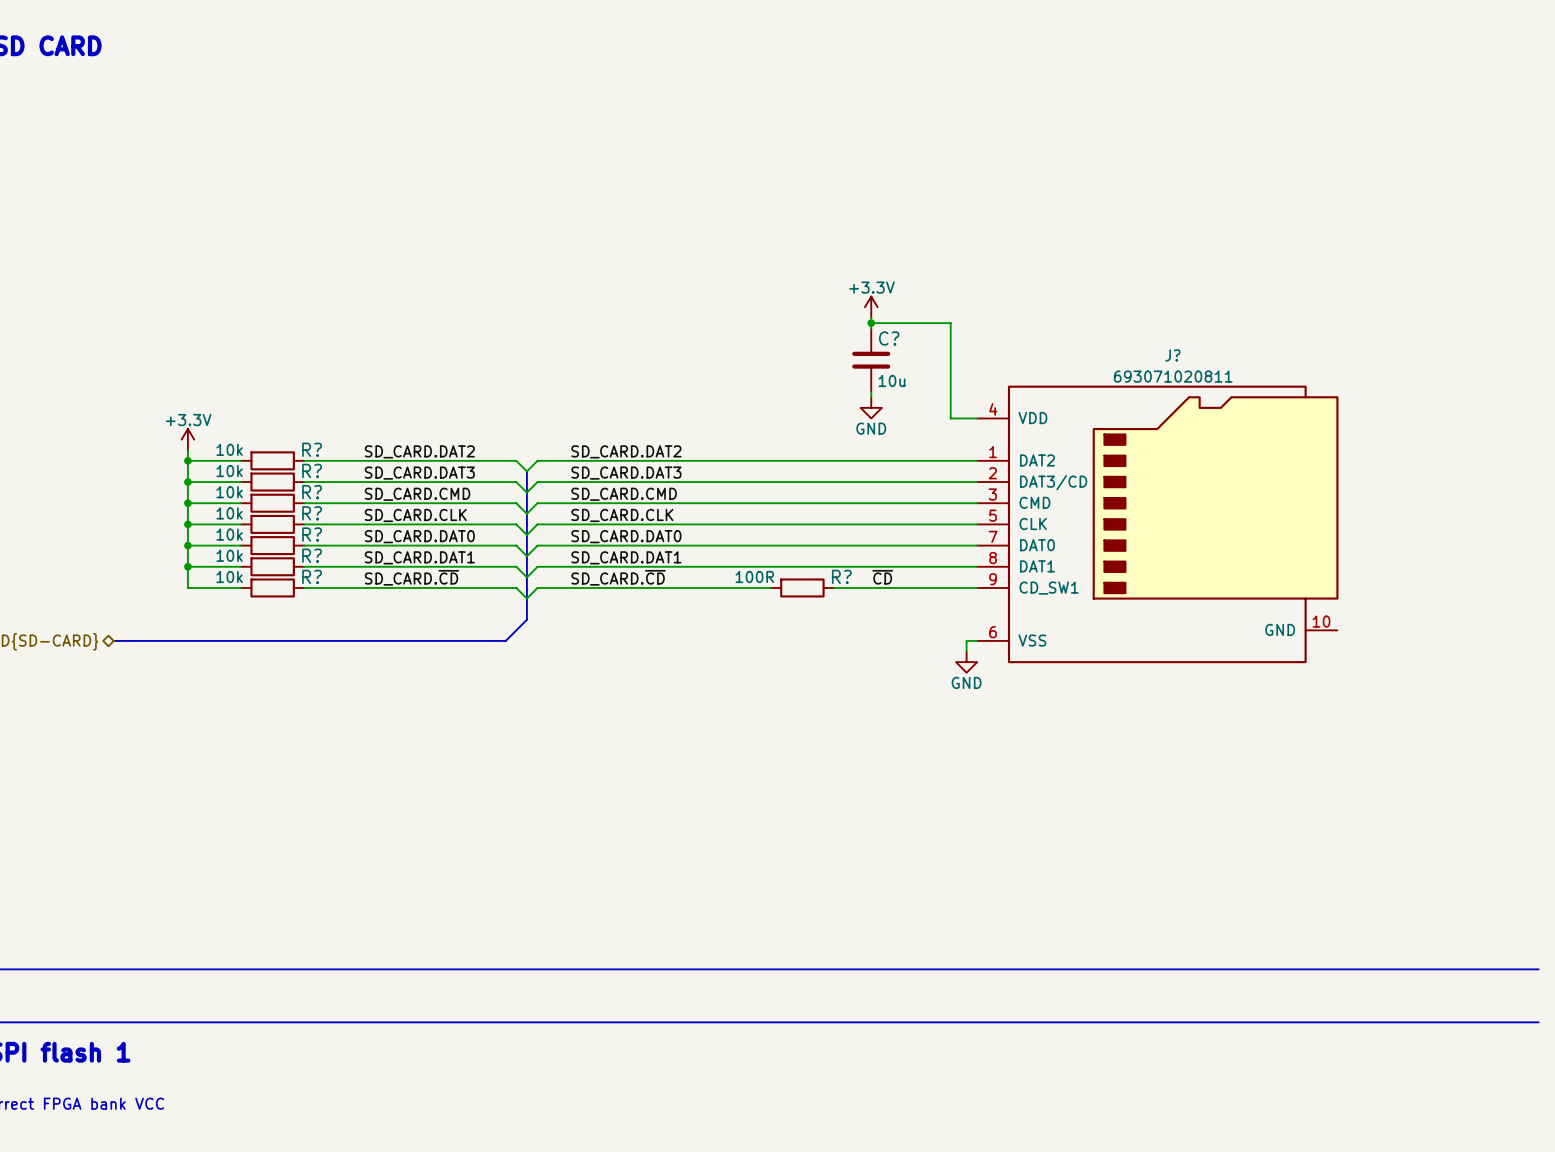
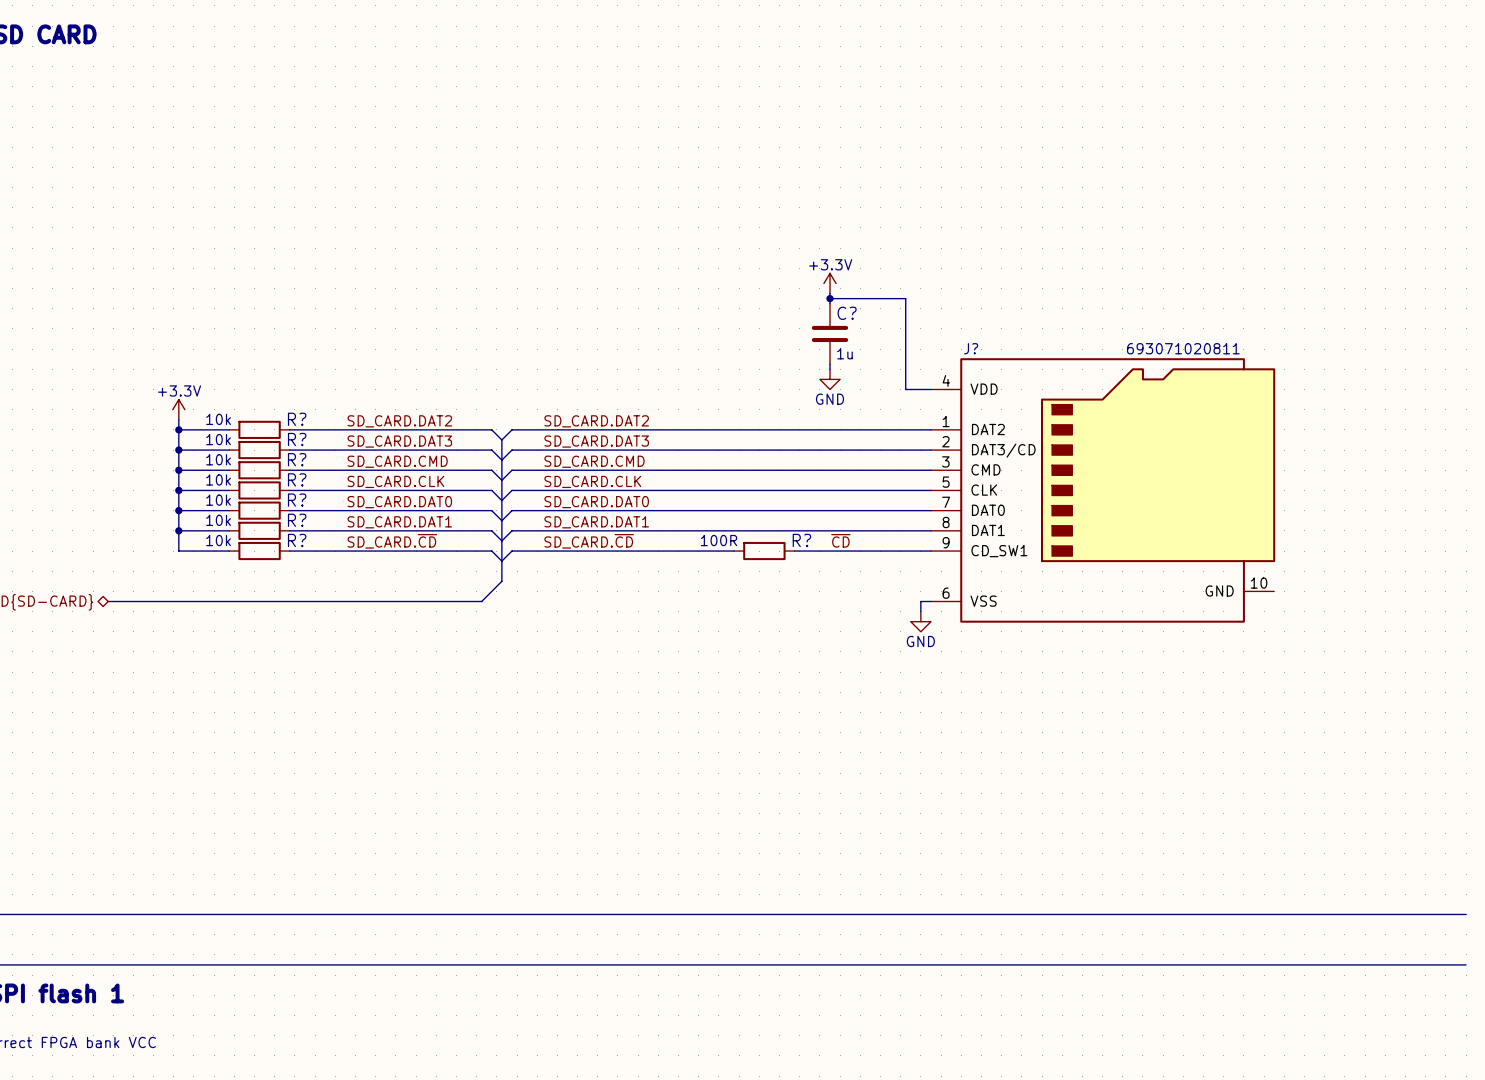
J? name position: J? (1172, 355) -> J? (971, 348)
J? value position: 693071020811 (1173, 376) -> 693071020811 (1183, 348)
C? text: 10u (892, 380) -> 1u (844, 353)

